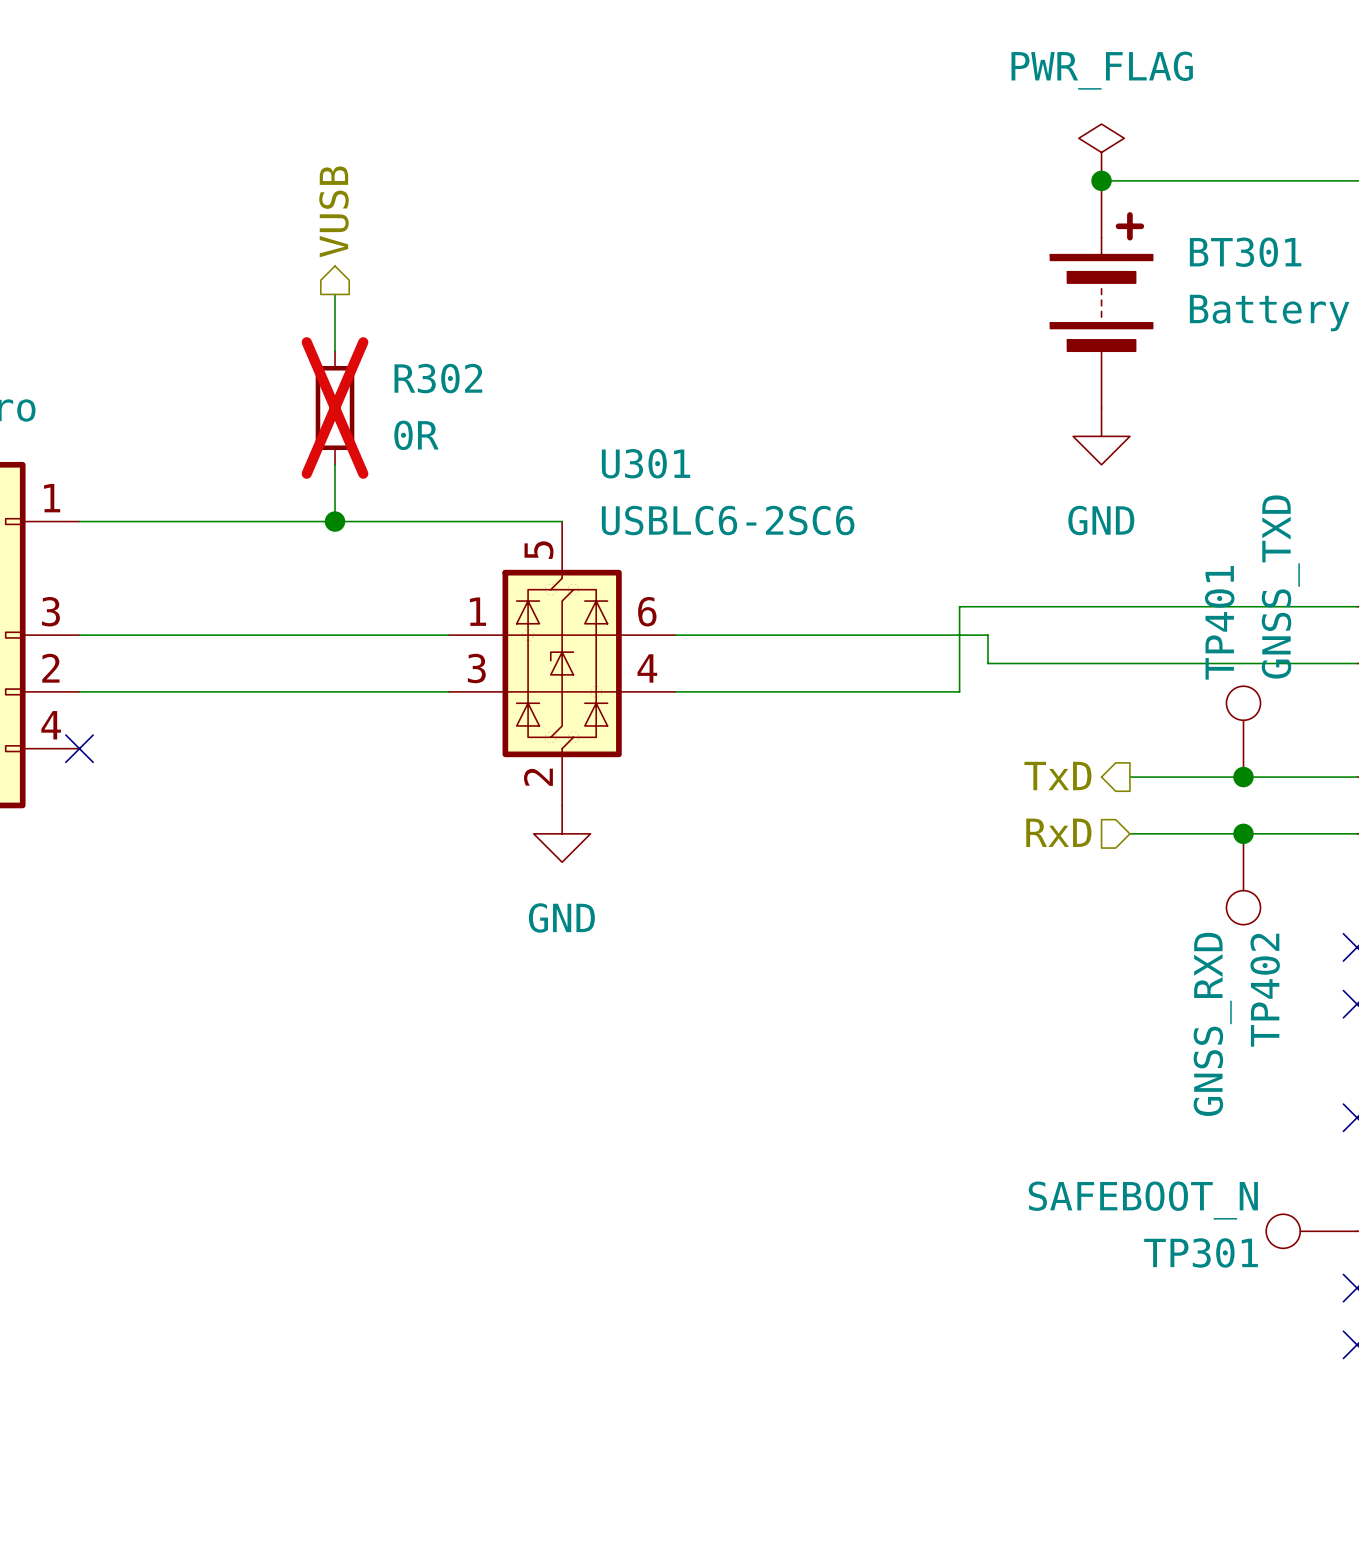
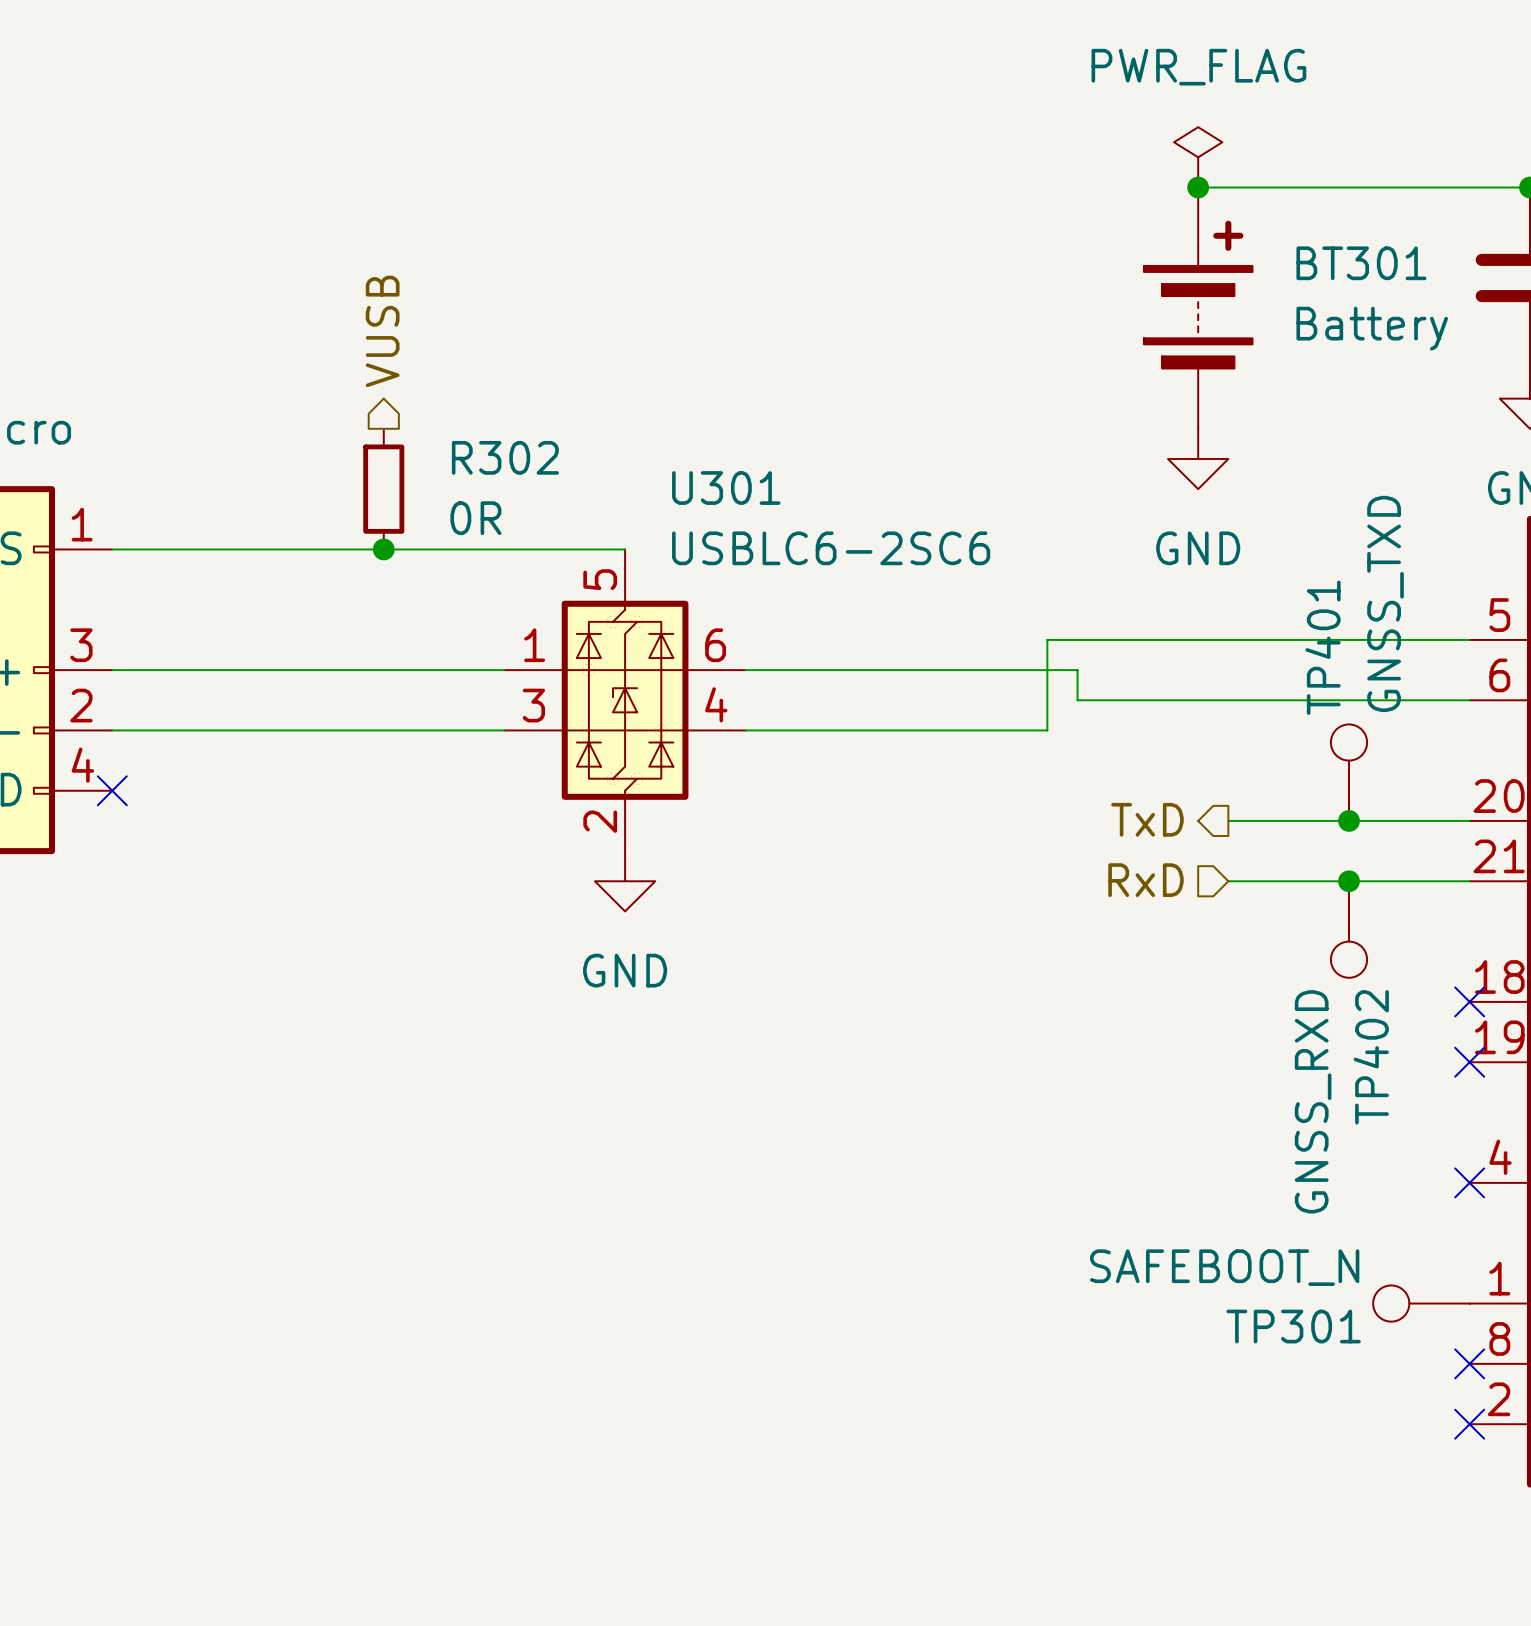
hierarchical label position: VUSB (333, 211) -> VUSB (382, 331)
wire: (335, 294) (335, 351) -> none
R302 position: (335, 408) -> (383, 489)
R302 do-not-place cross: (335, 408) -> none
wire: (335, 464) (335, 521) -> none

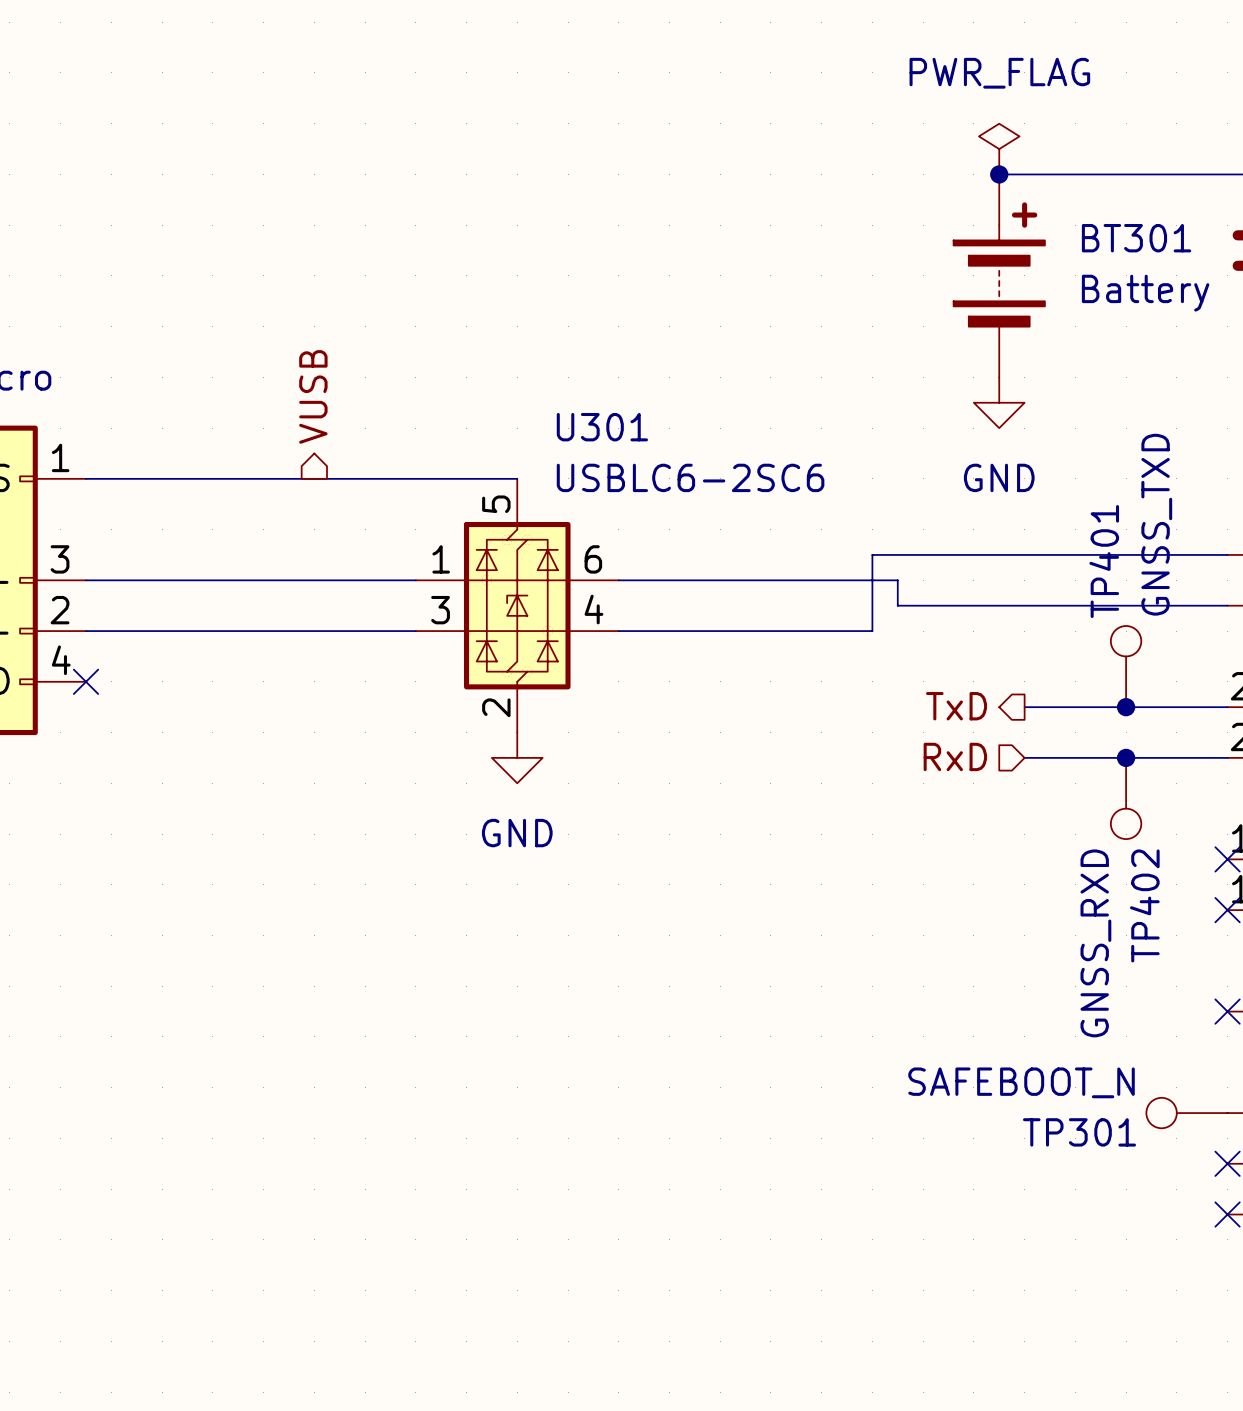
hierarchical label position: VUSB (382, 331) -> VUSB (313, 396)
R302: 0R (383, 489) -> none
junction: (383, 549) -> none

